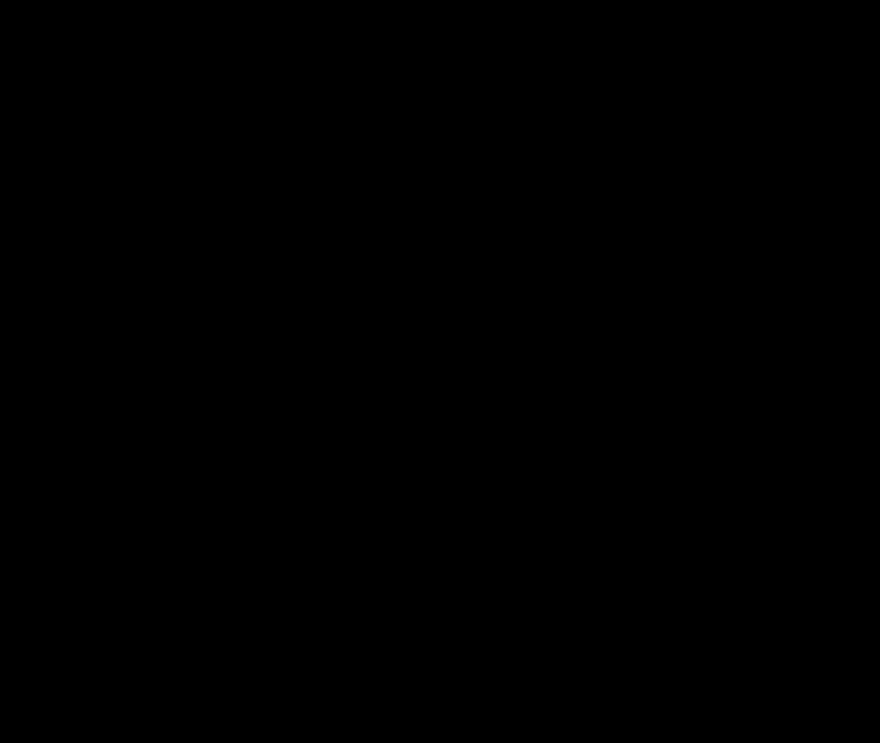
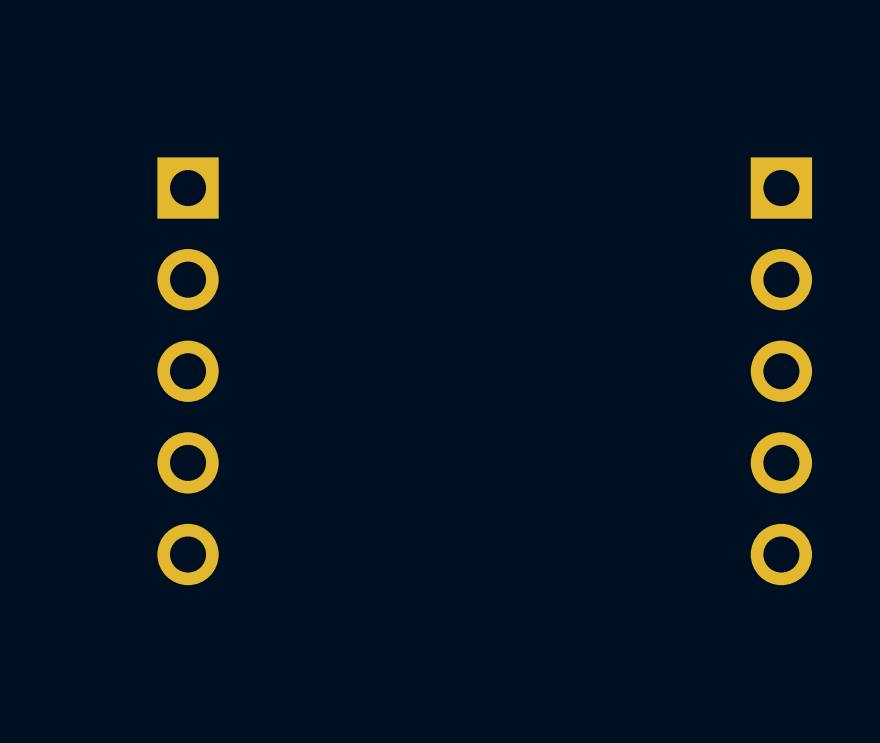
part: none -> (188, 371)
part: none -> (781, 371)

